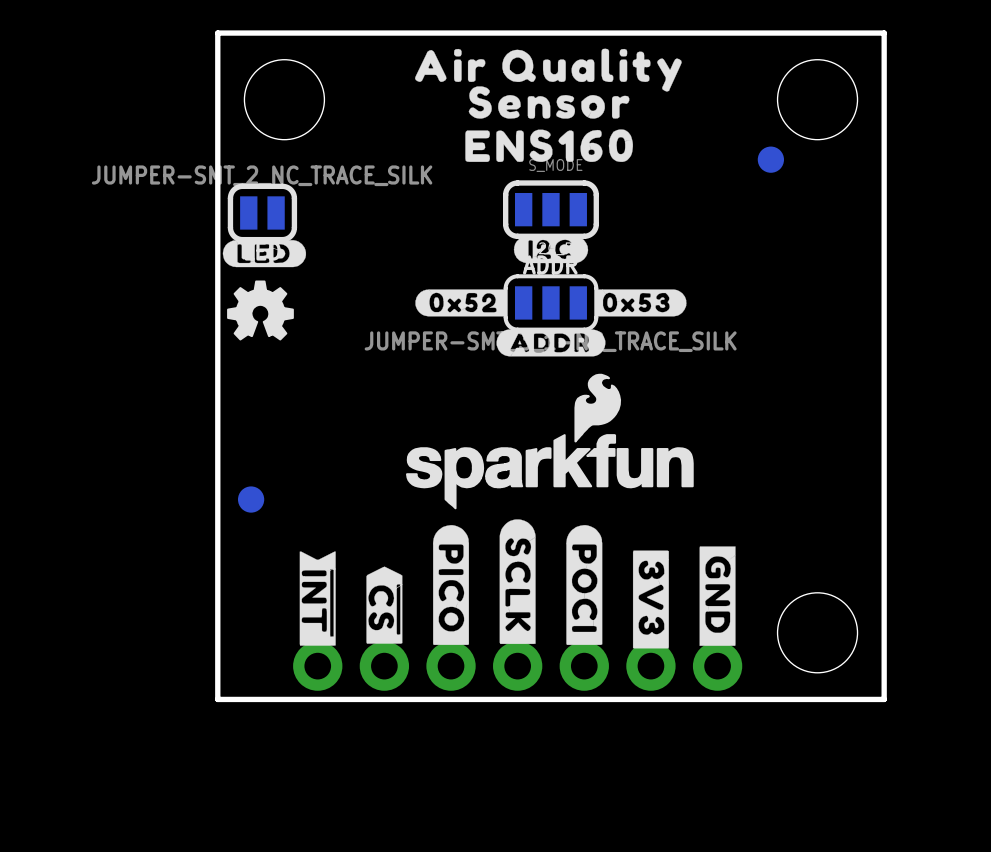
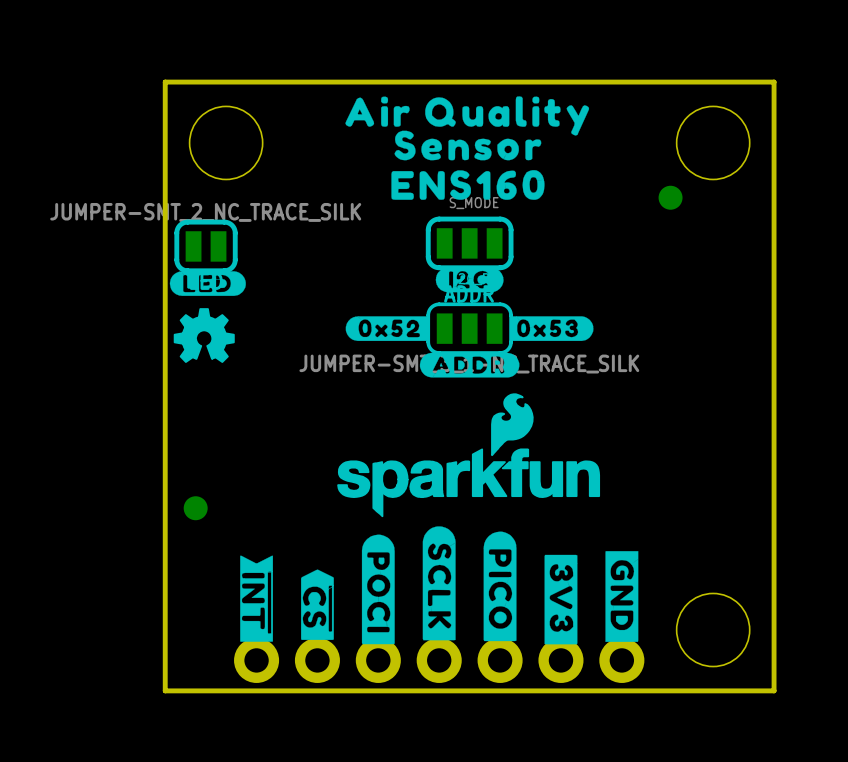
drawing position: (451, 585) -> (500, 586)
drawing position: (584, 585) -> (378, 589)

